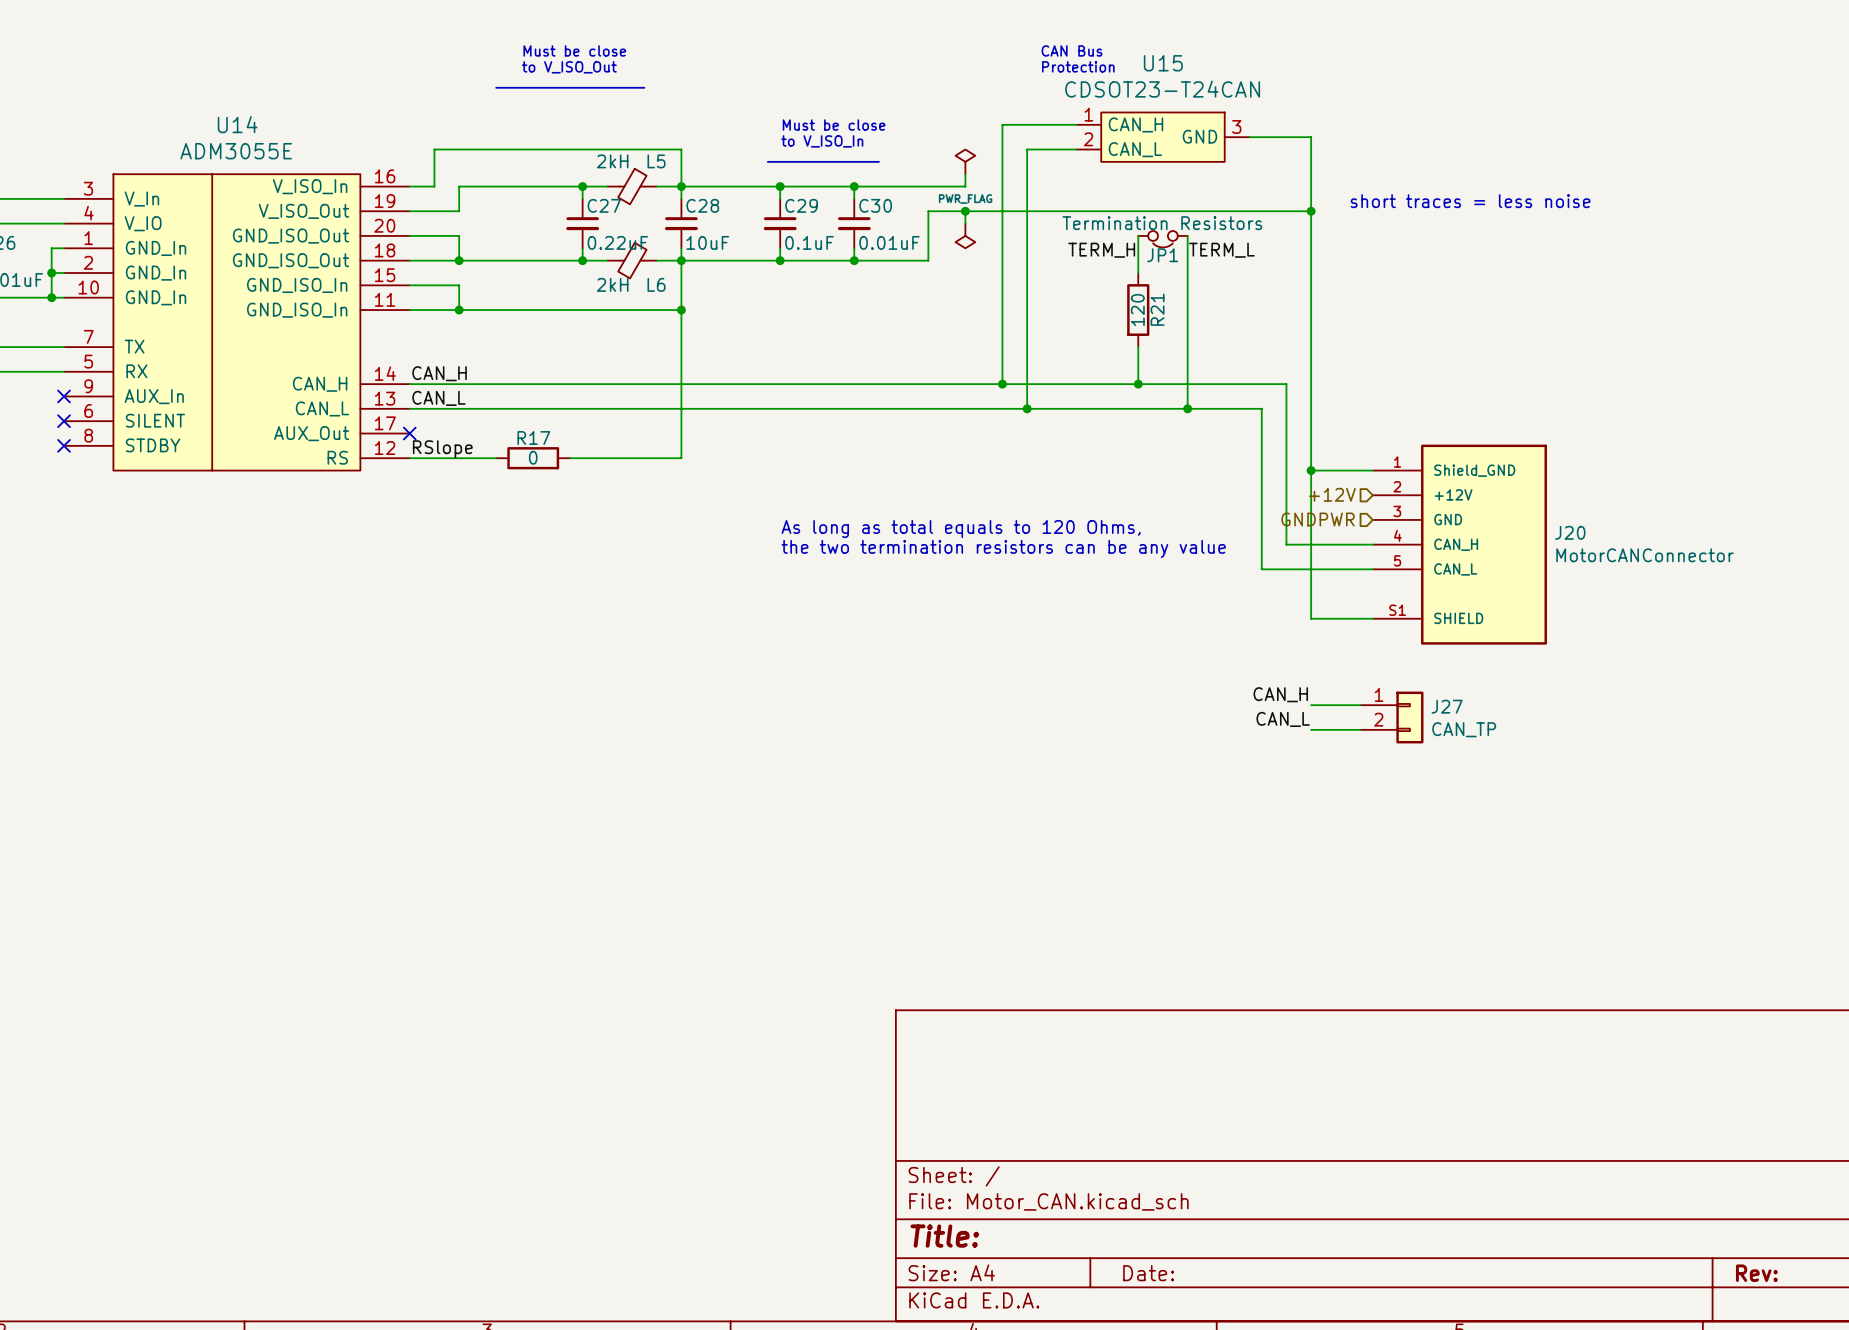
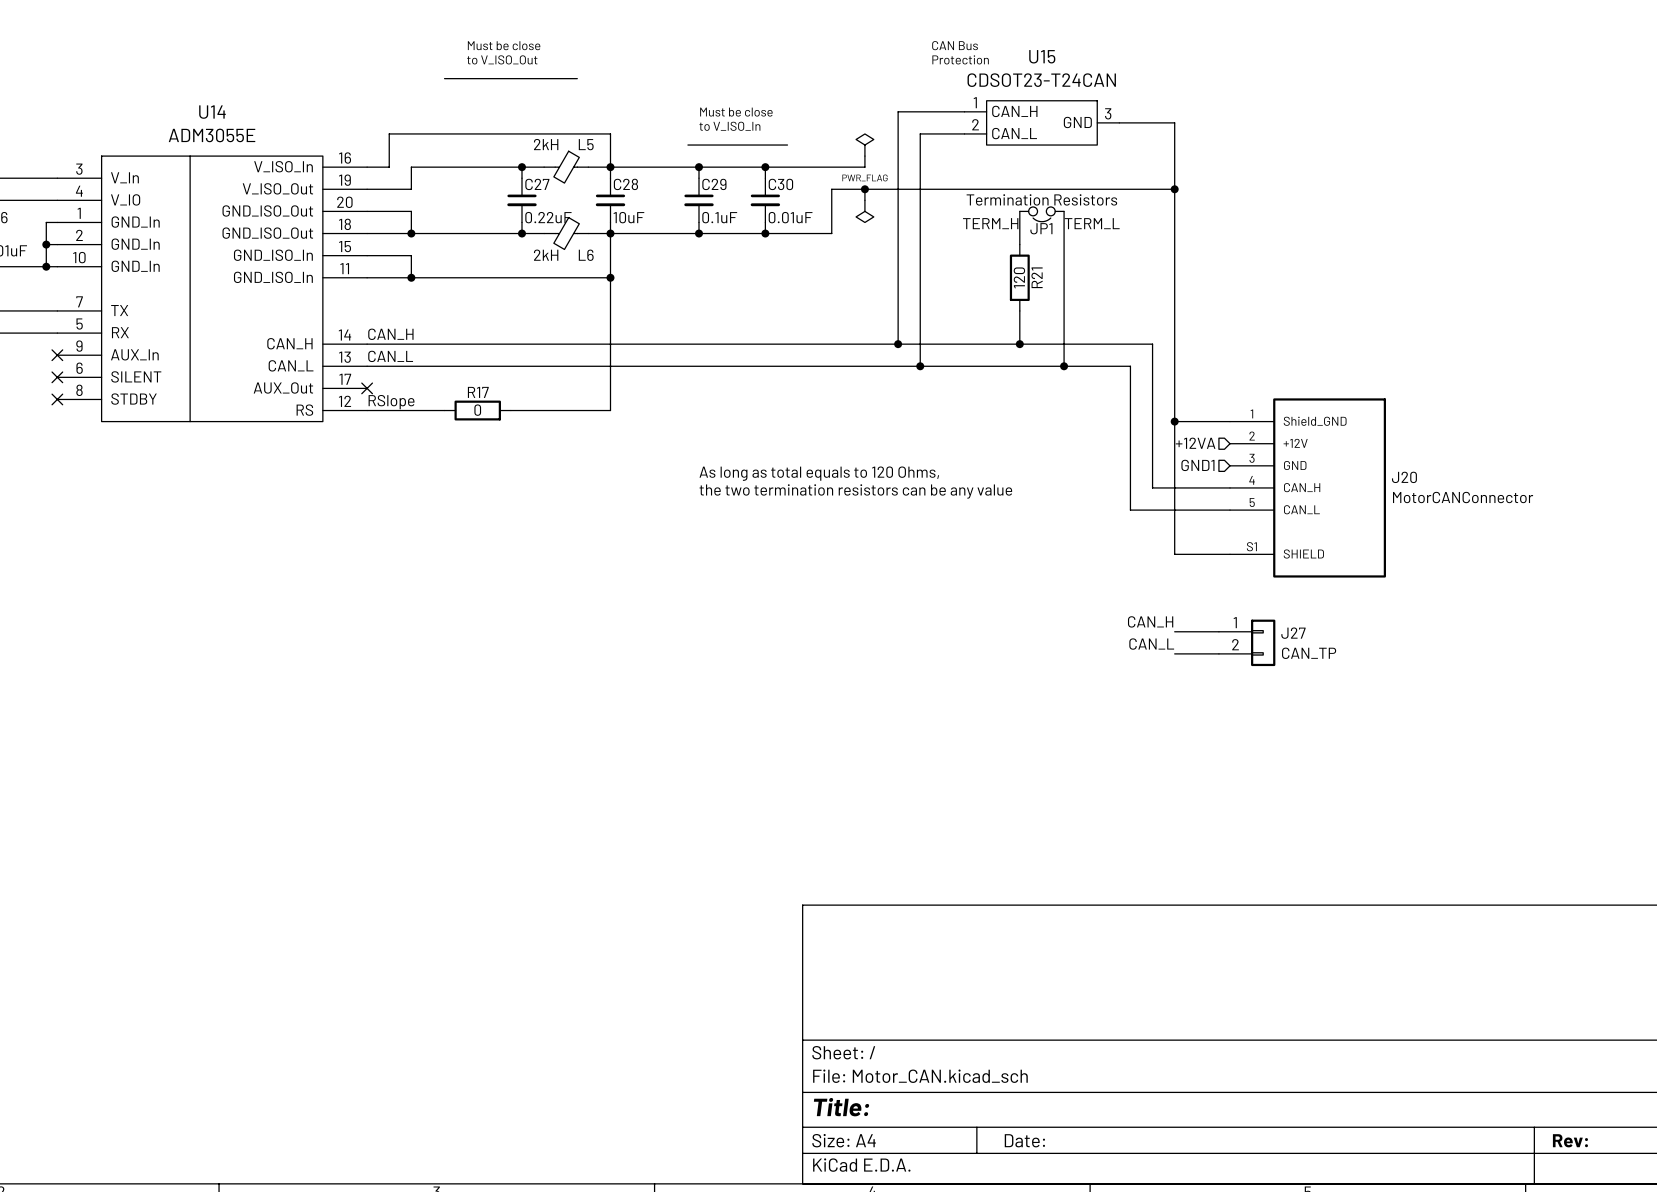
text: short traces = less noise (1470, 201) -> none
hierarchical label: +12V (1332, 494) -> +12VA (1195, 443)
hierarchical label: GNDPWR (1318, 519) -> GND1 (1197, 465)

